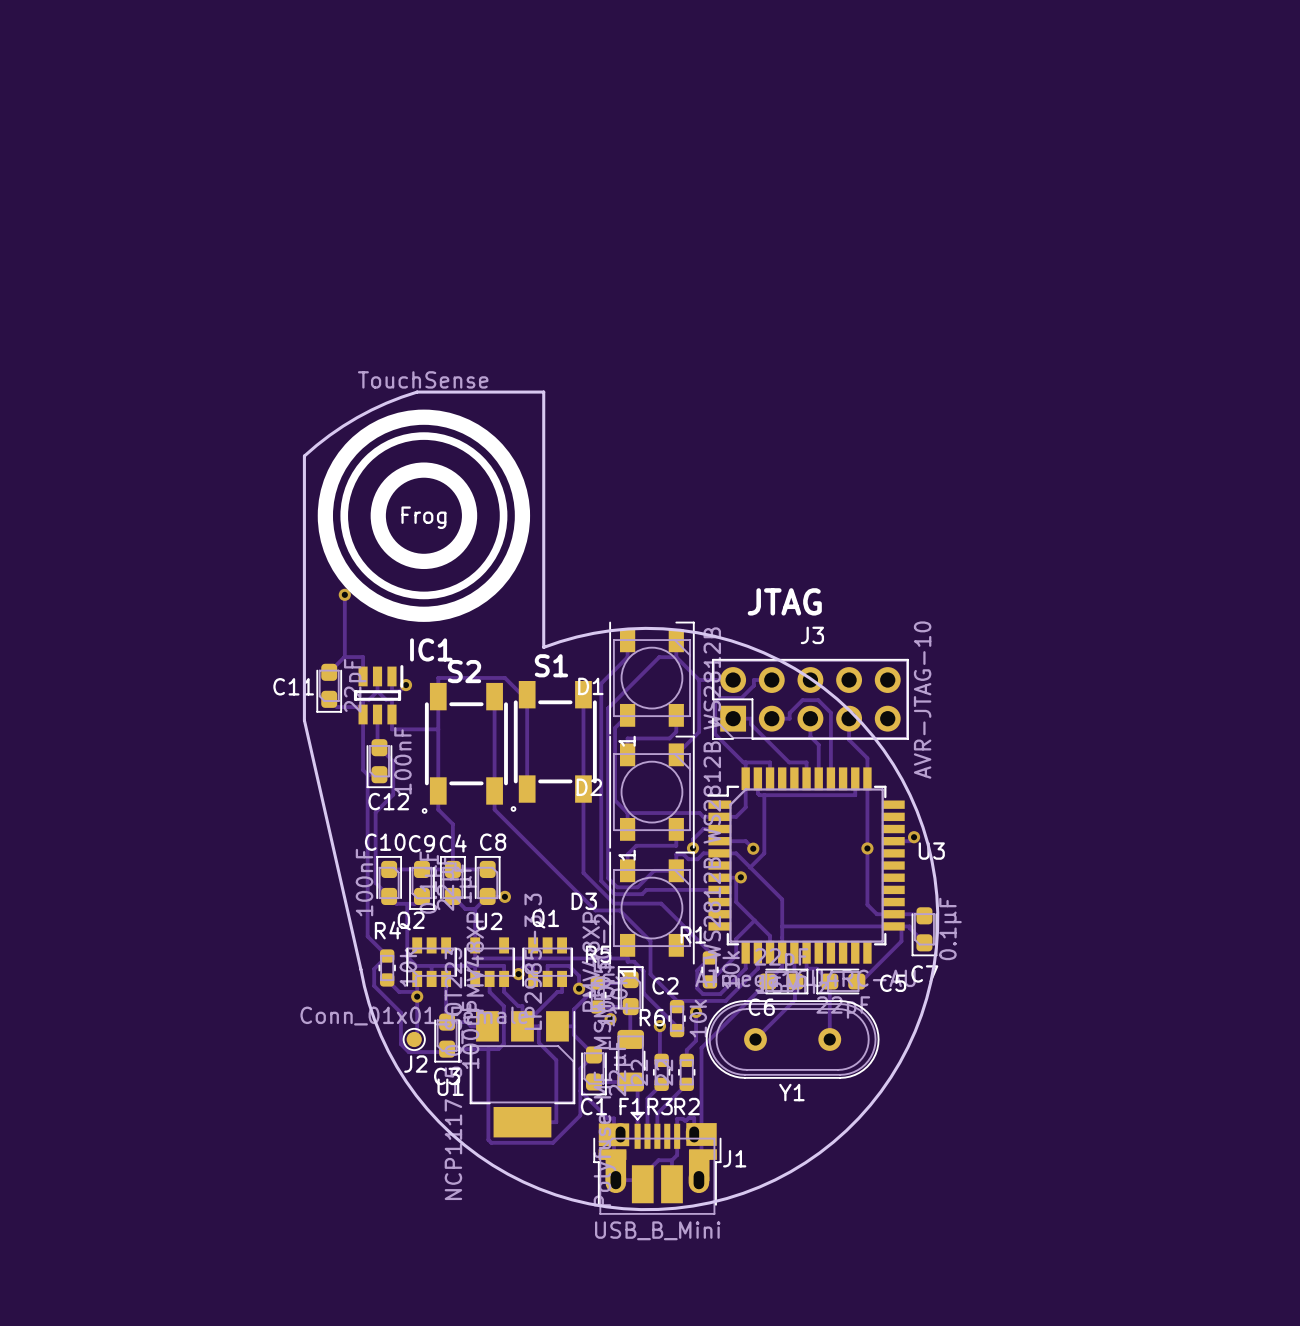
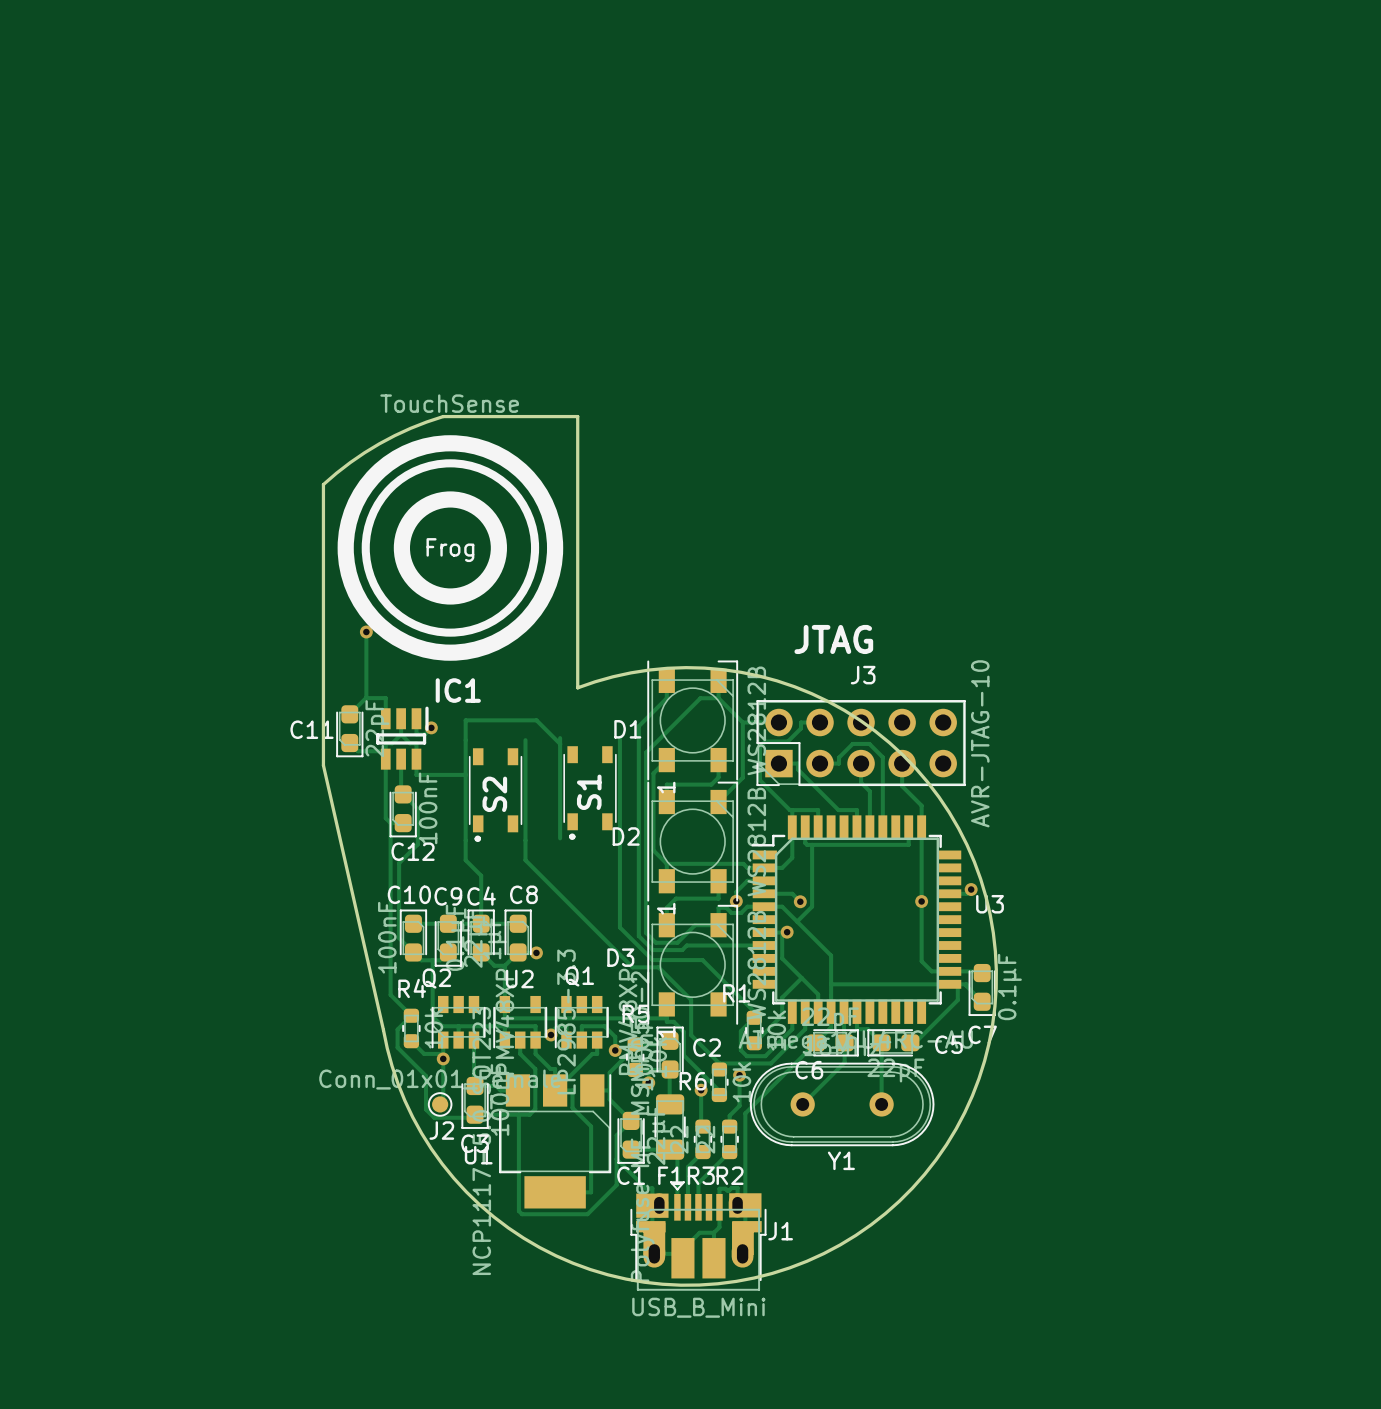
S1 name position: S1 (551, 665) -> S1 (589, 792)
S2 name position: S2 (464, 671) -> S2 (494, 794)
S1 footprint: [510, 681, 597, 812] -> [563, 746, 617, 840]
S2 footprint: [421, 682, 508, 814] -> [468, 748, 523, 843]

